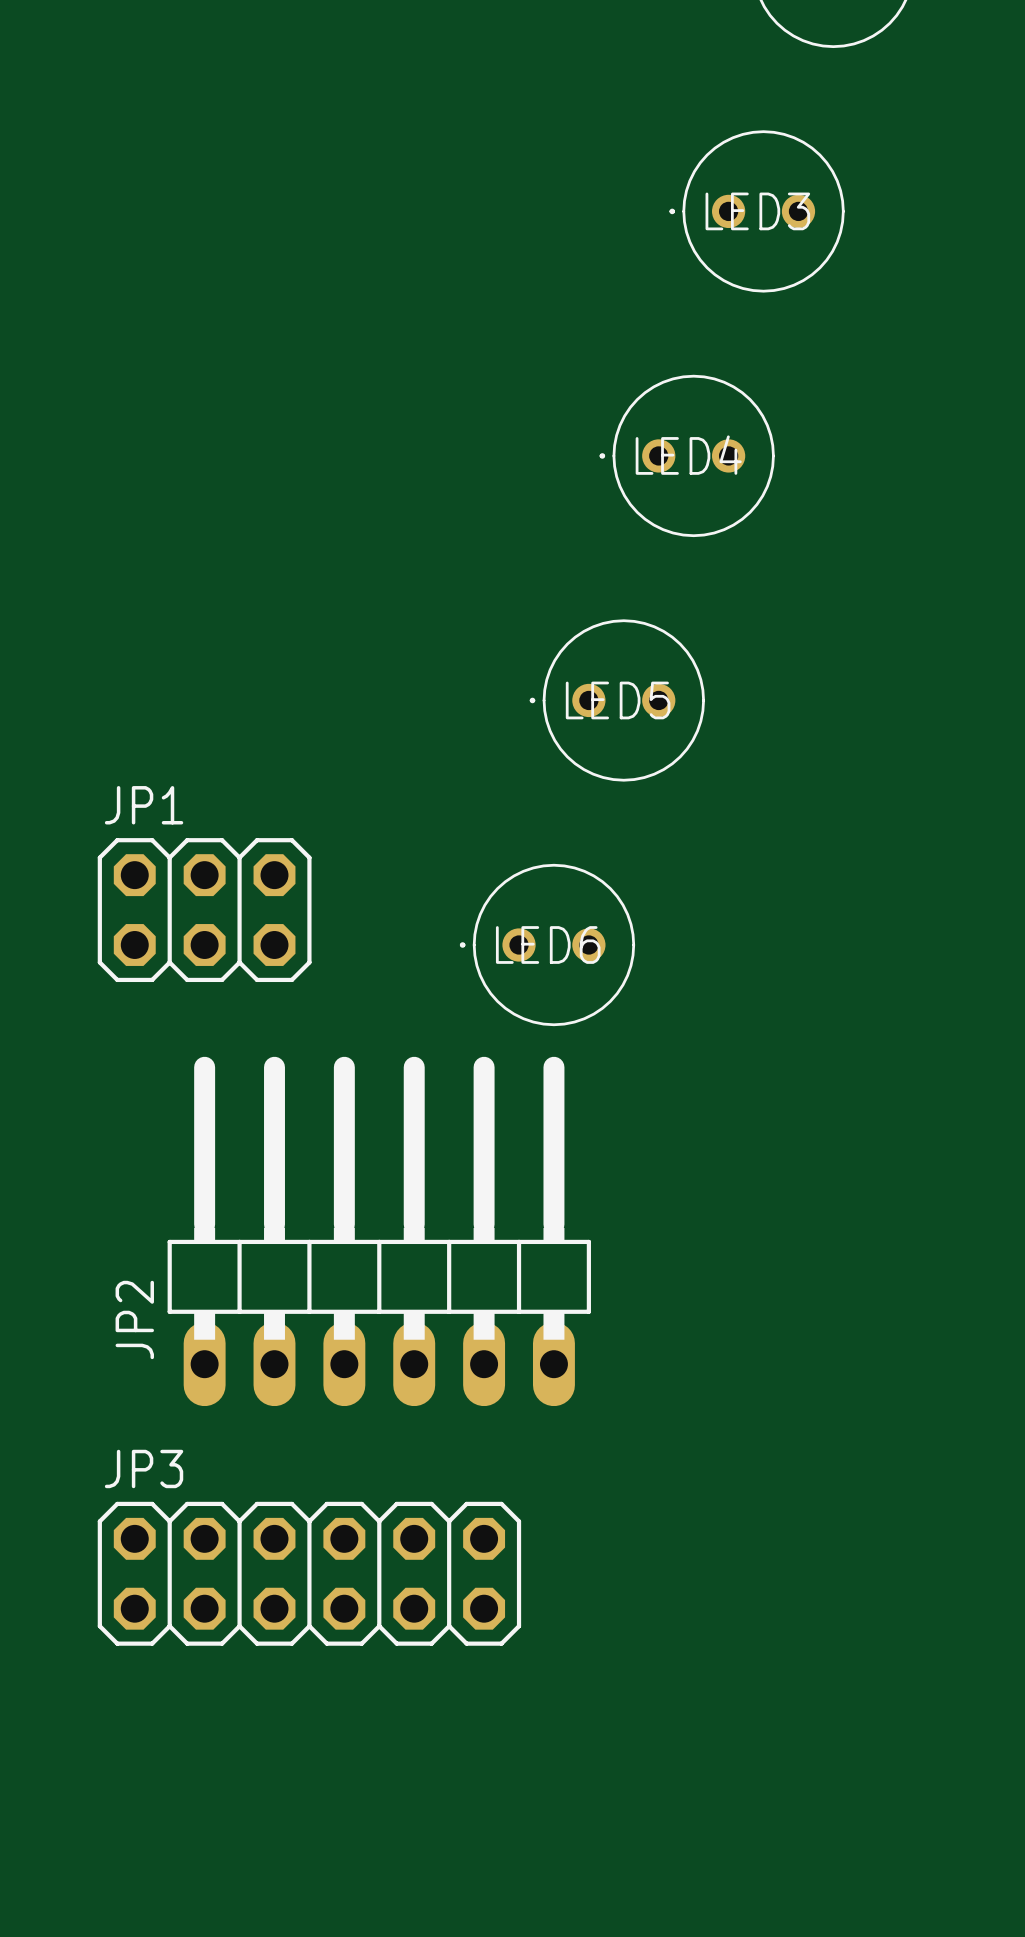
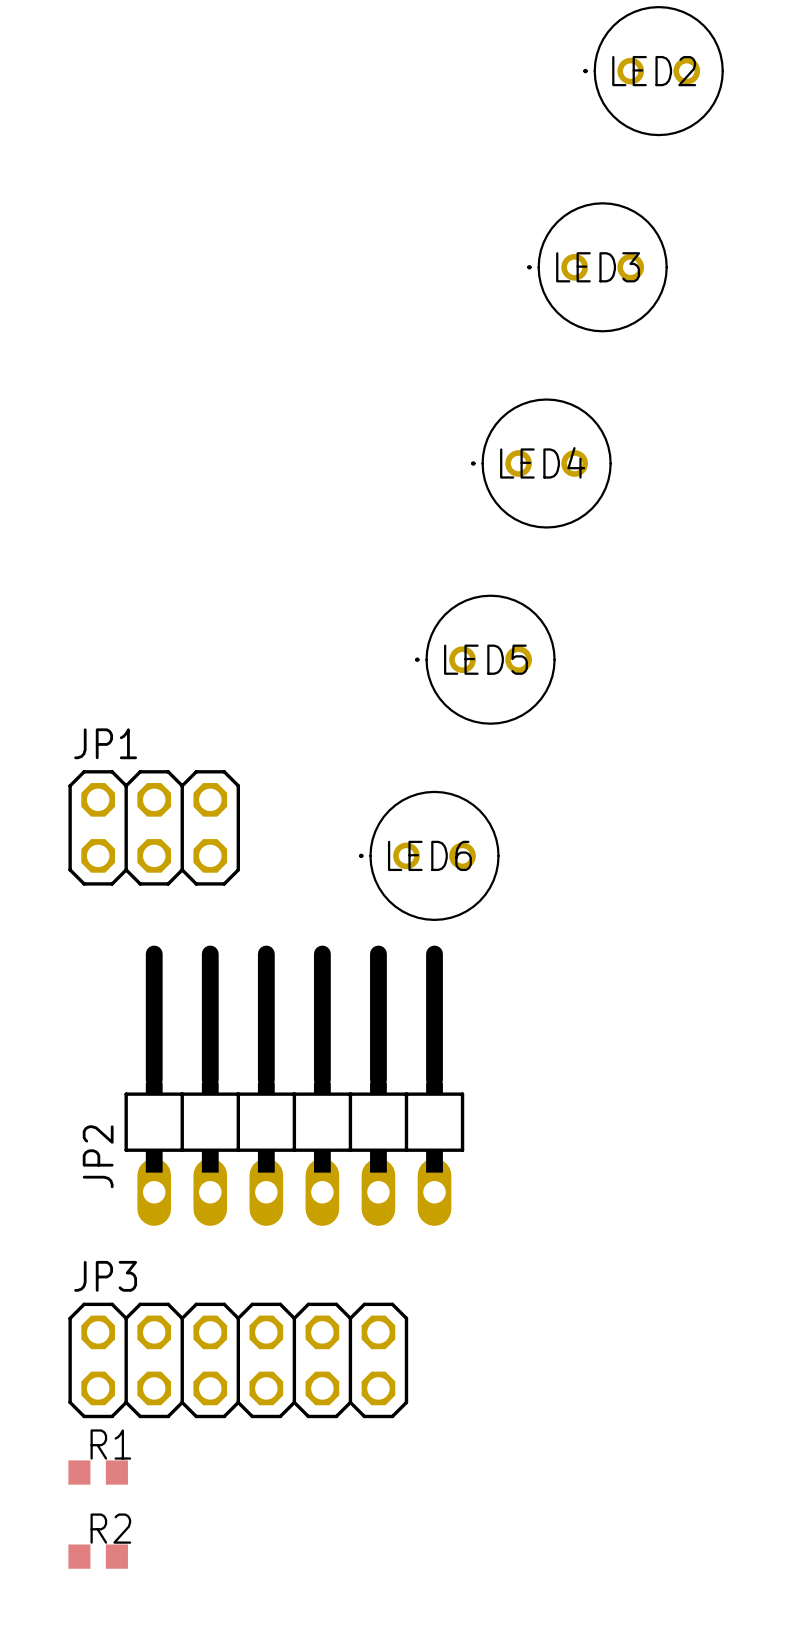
R1: none -> (98, 1472)
R2: none -> (98, 1556)

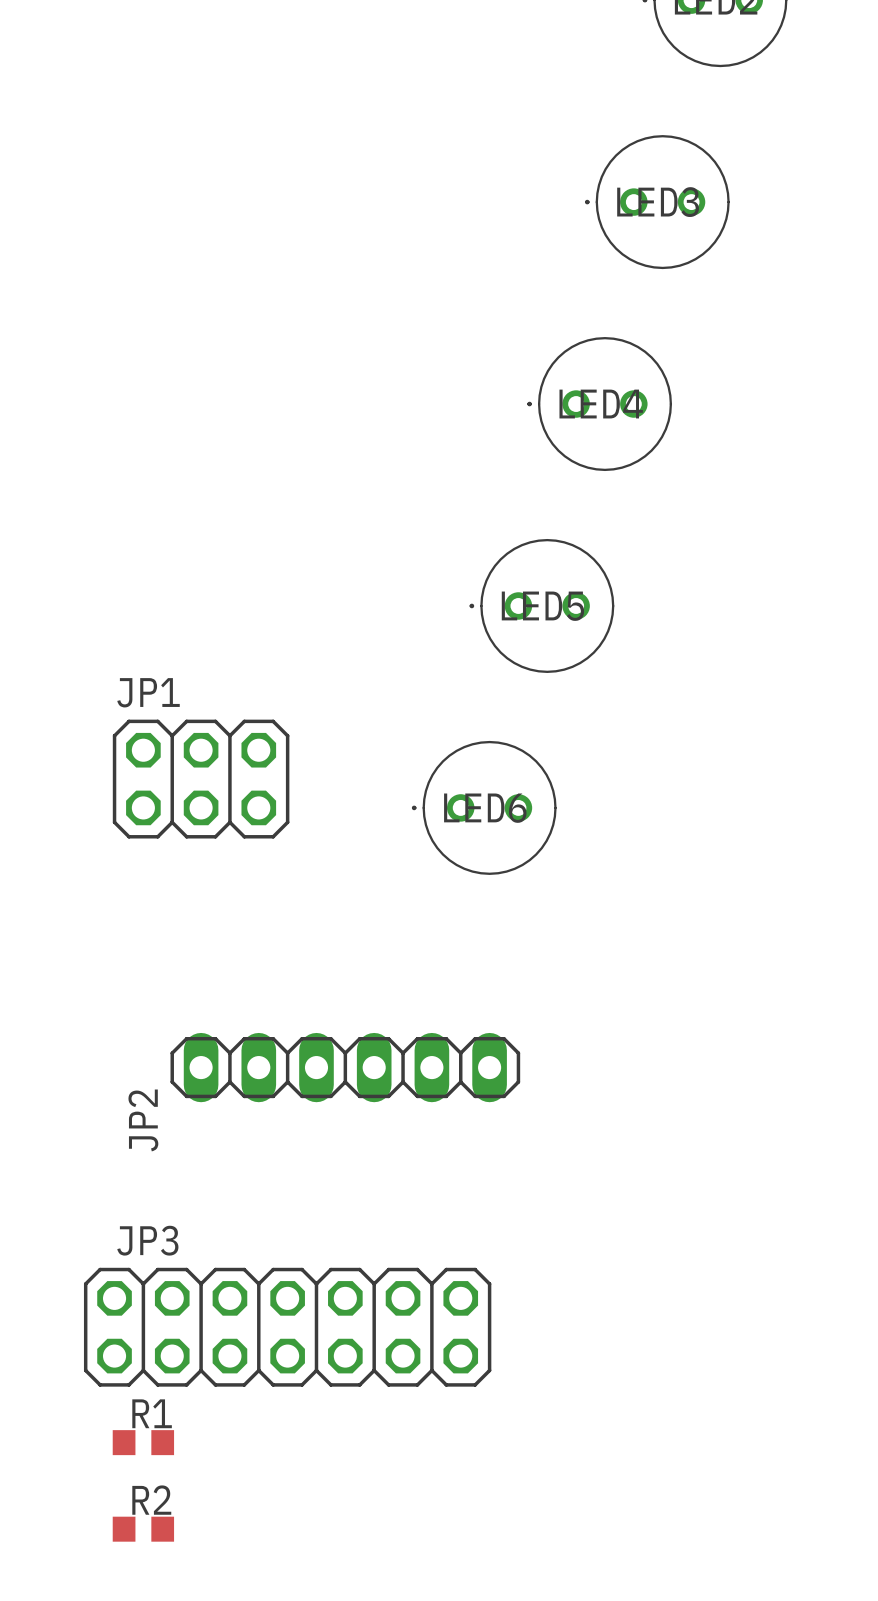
JP2 footprint: [124, 945, 465, 1226] -> [170, 1032, 521, 1103]
JP3 footprint: [68, 1302, 409, 1419] -> [83, 1267, 492, 1387]

